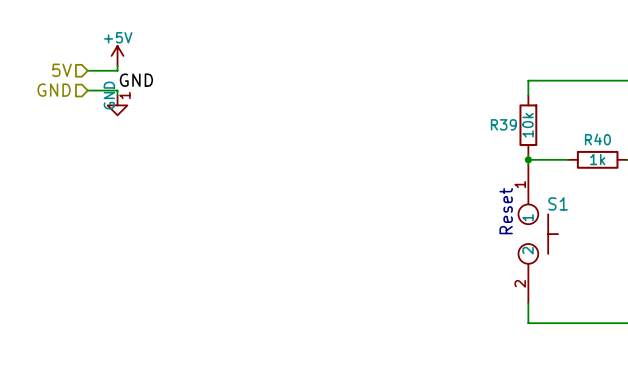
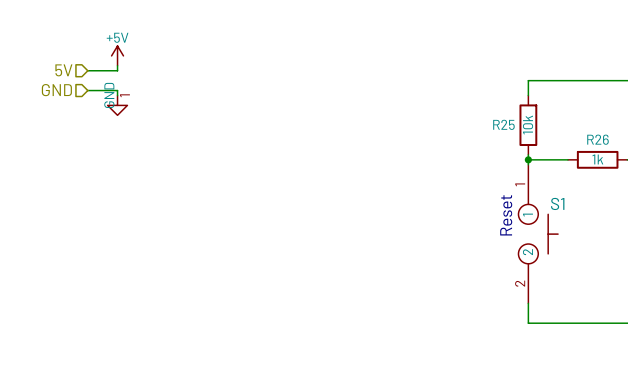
label: GND (136, 80) -> none
R39 name: R39 (503, 124) -> R25 (503, 124)
R40 name: R40 (597, 139) -> R26 (597, 139)

